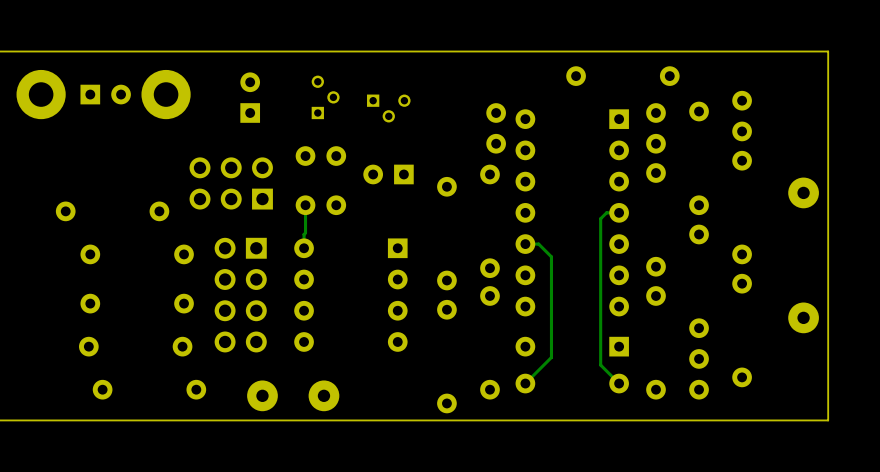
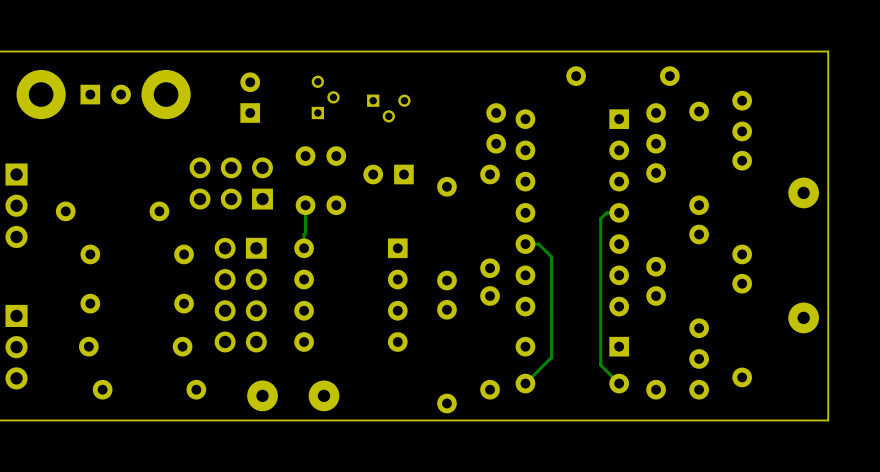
part: none -> (16, 205)
part: none -> (16, 347)

